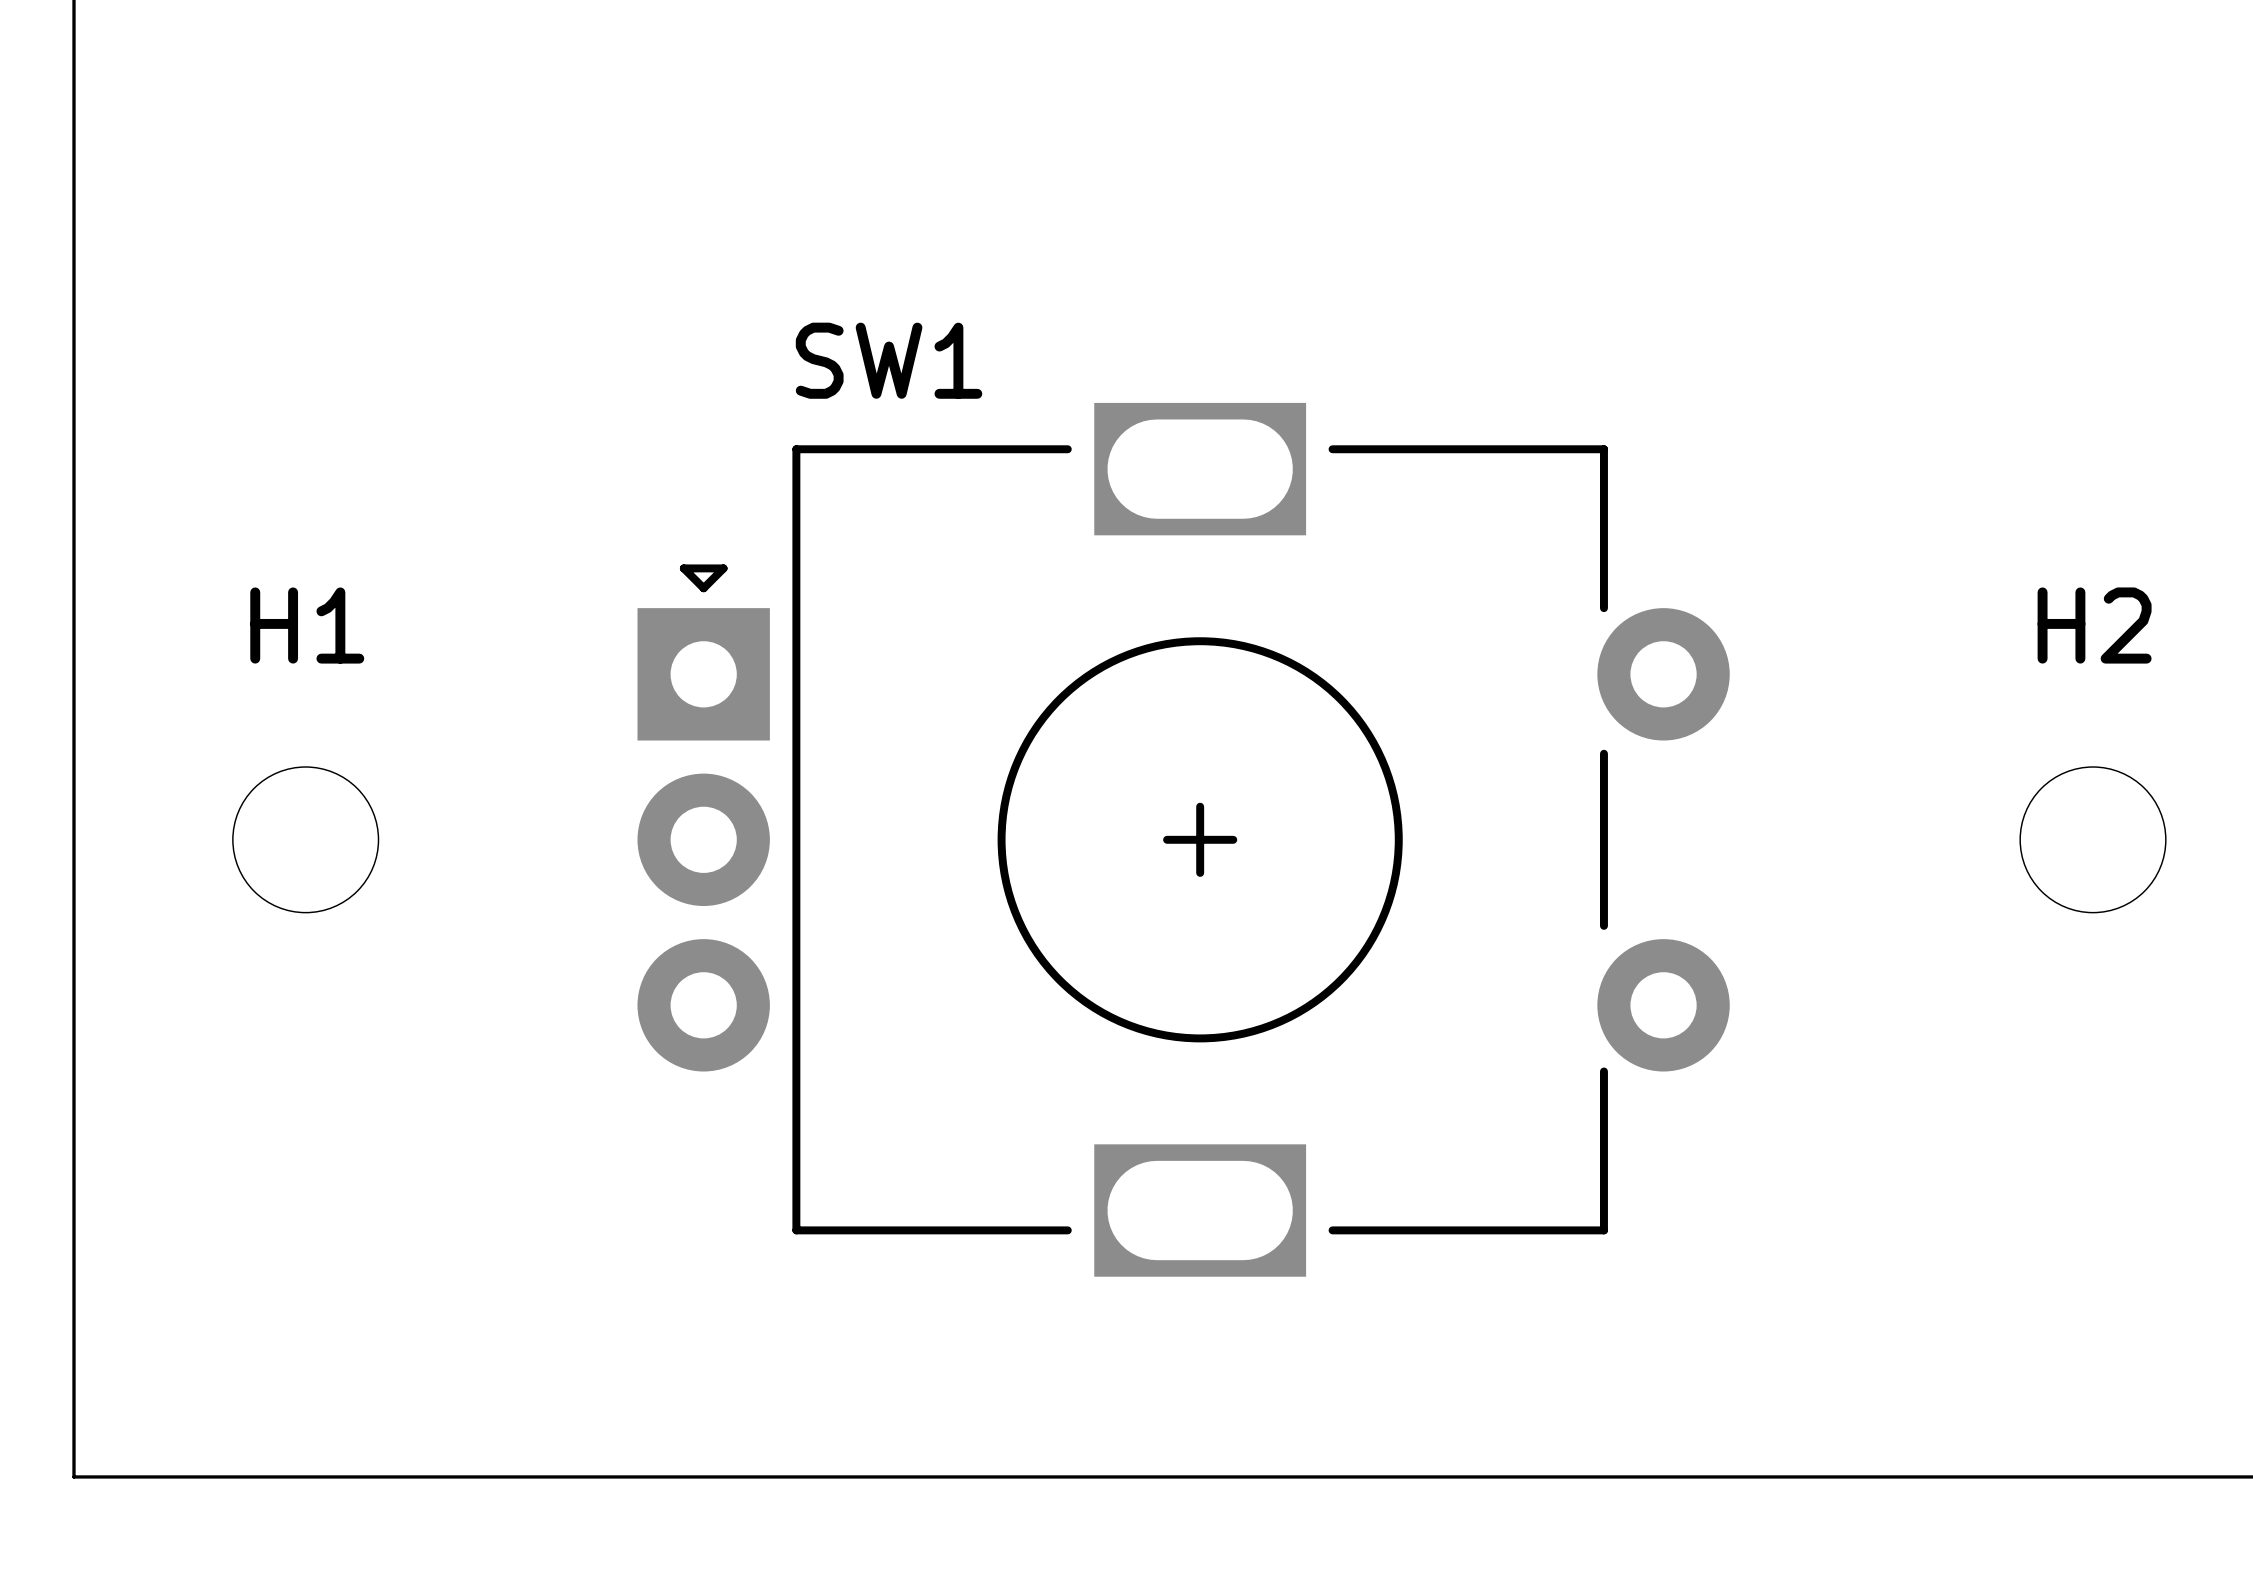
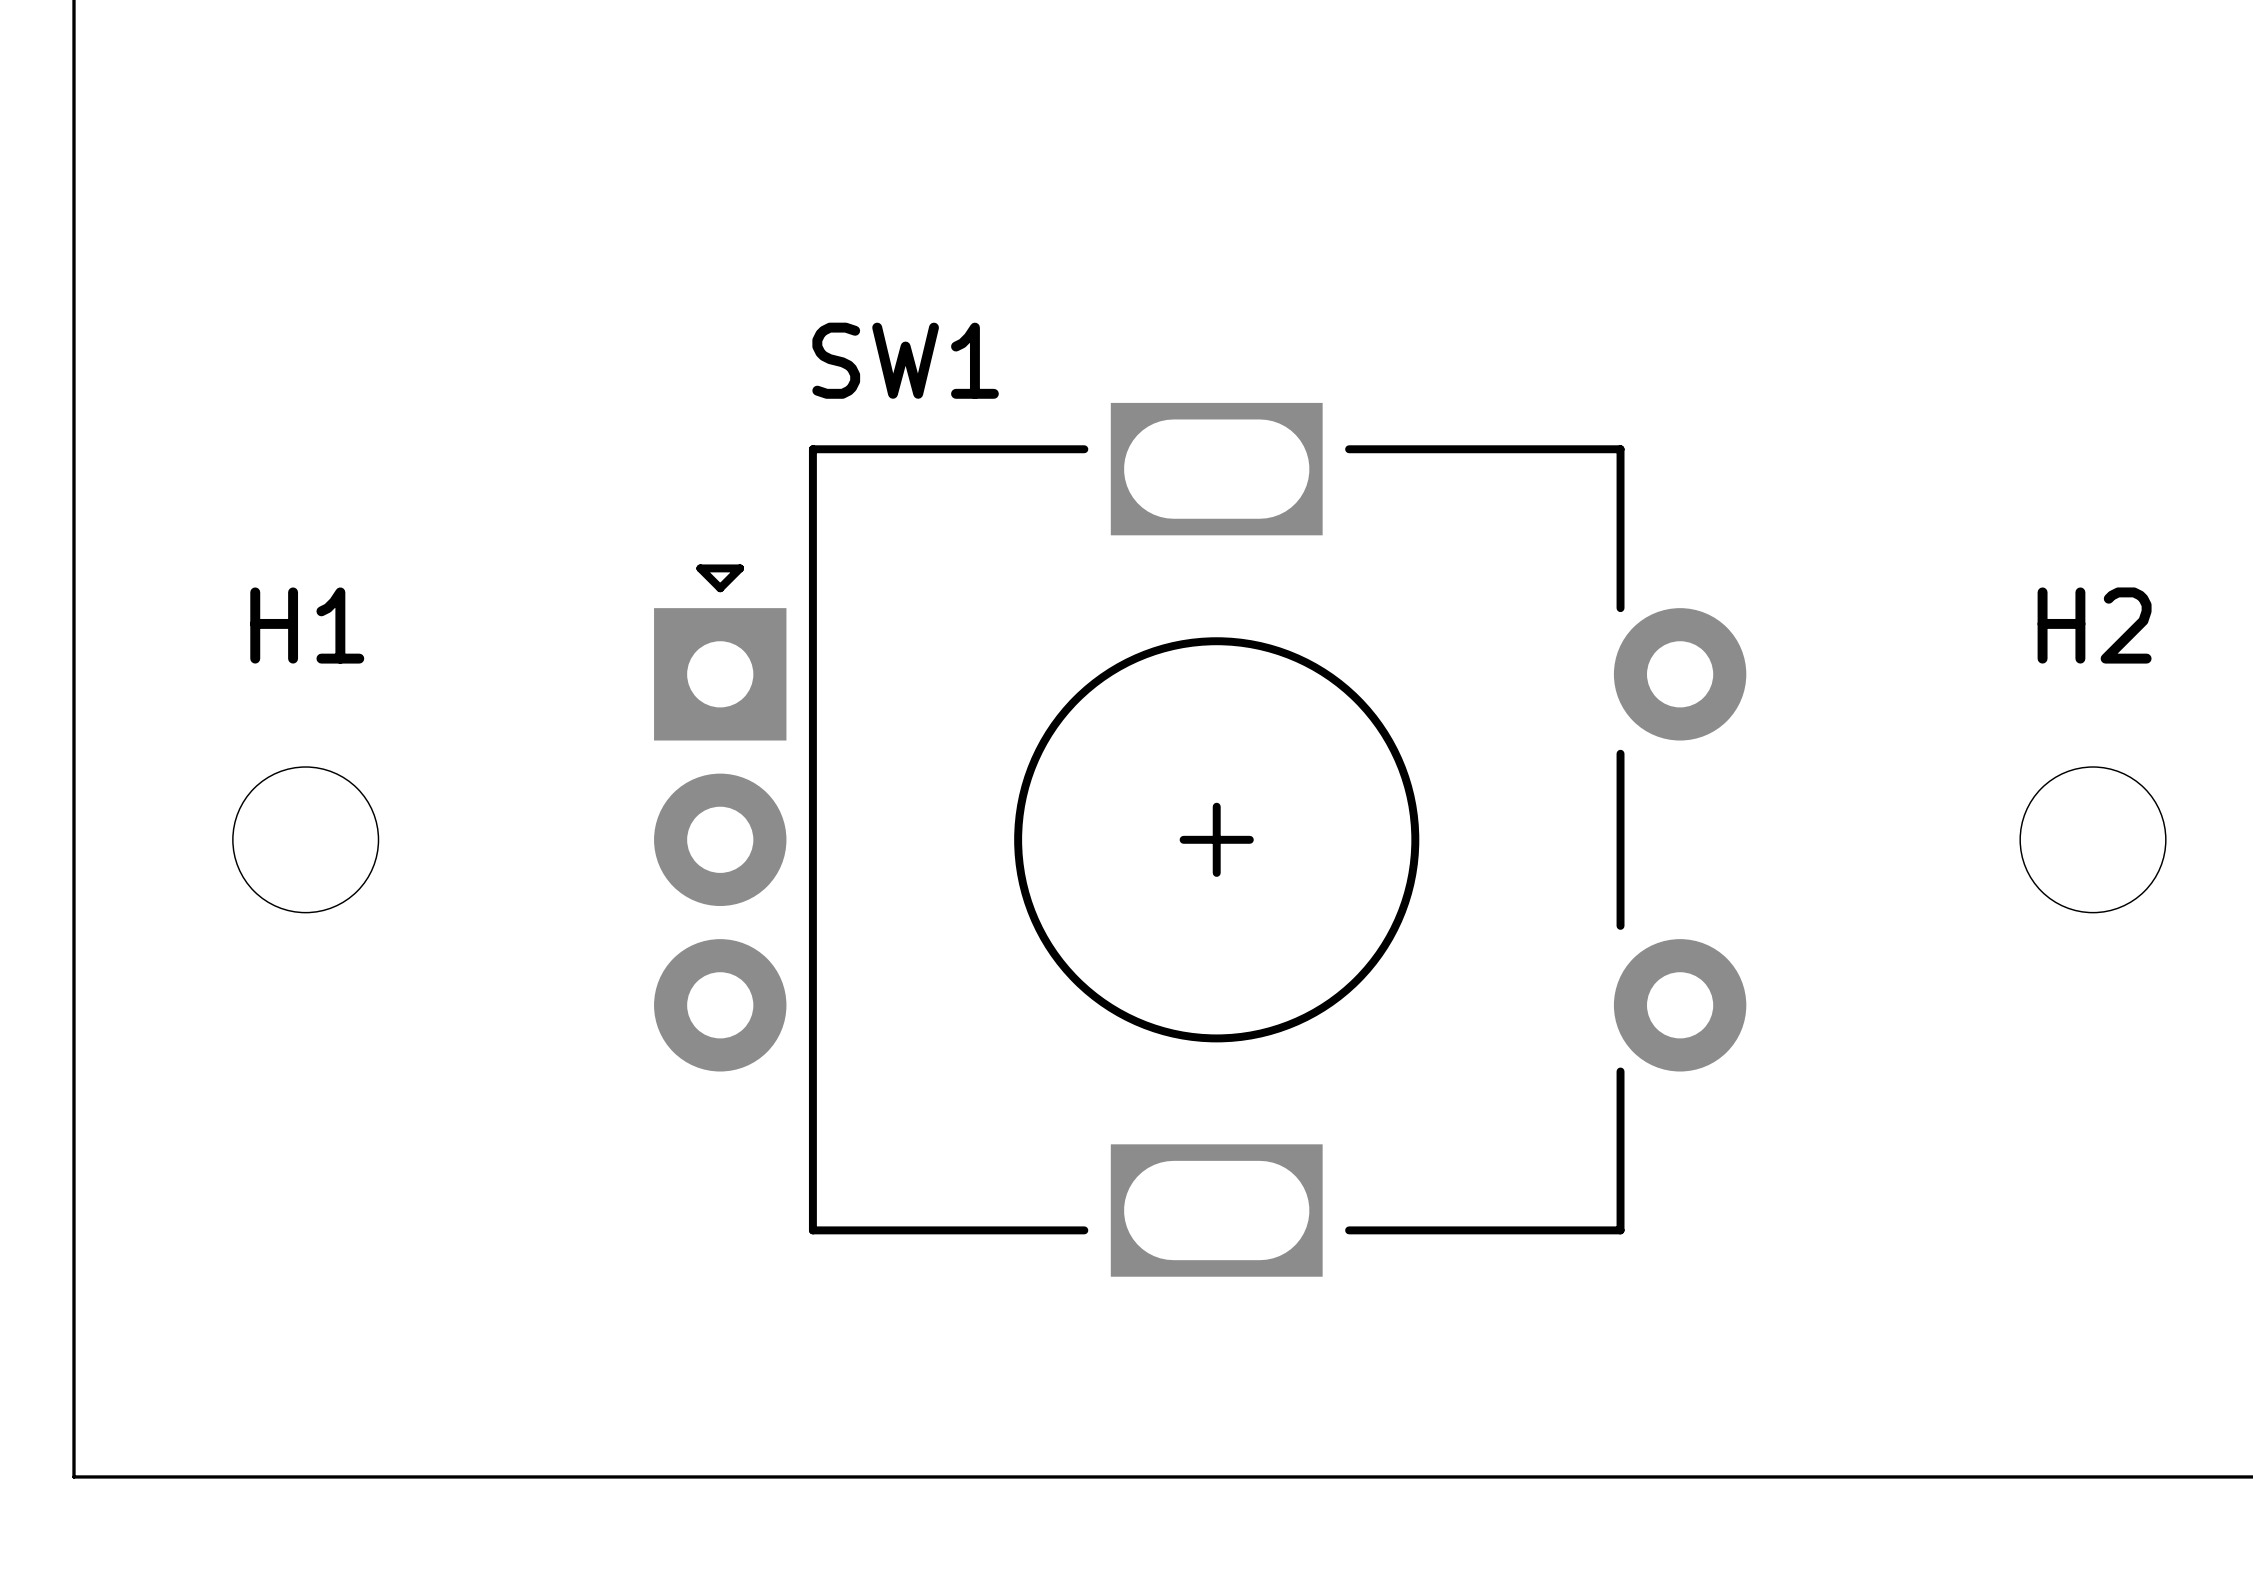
SW1 position: (1183, 839) -> (1200, 839)

